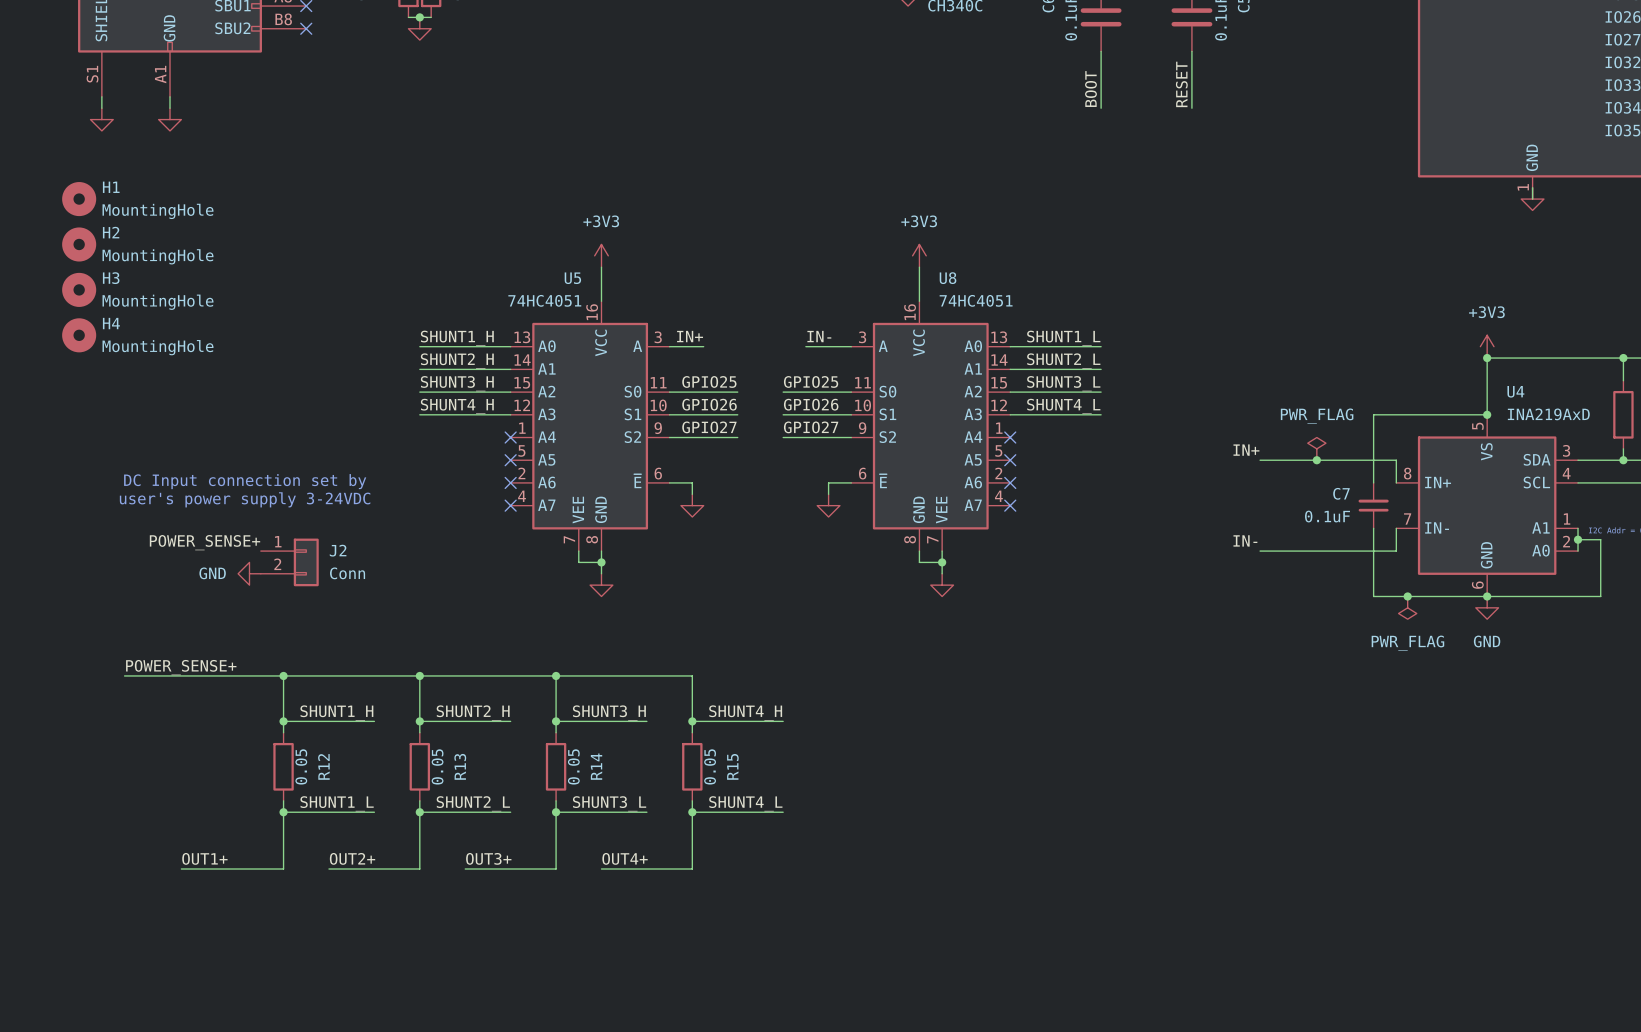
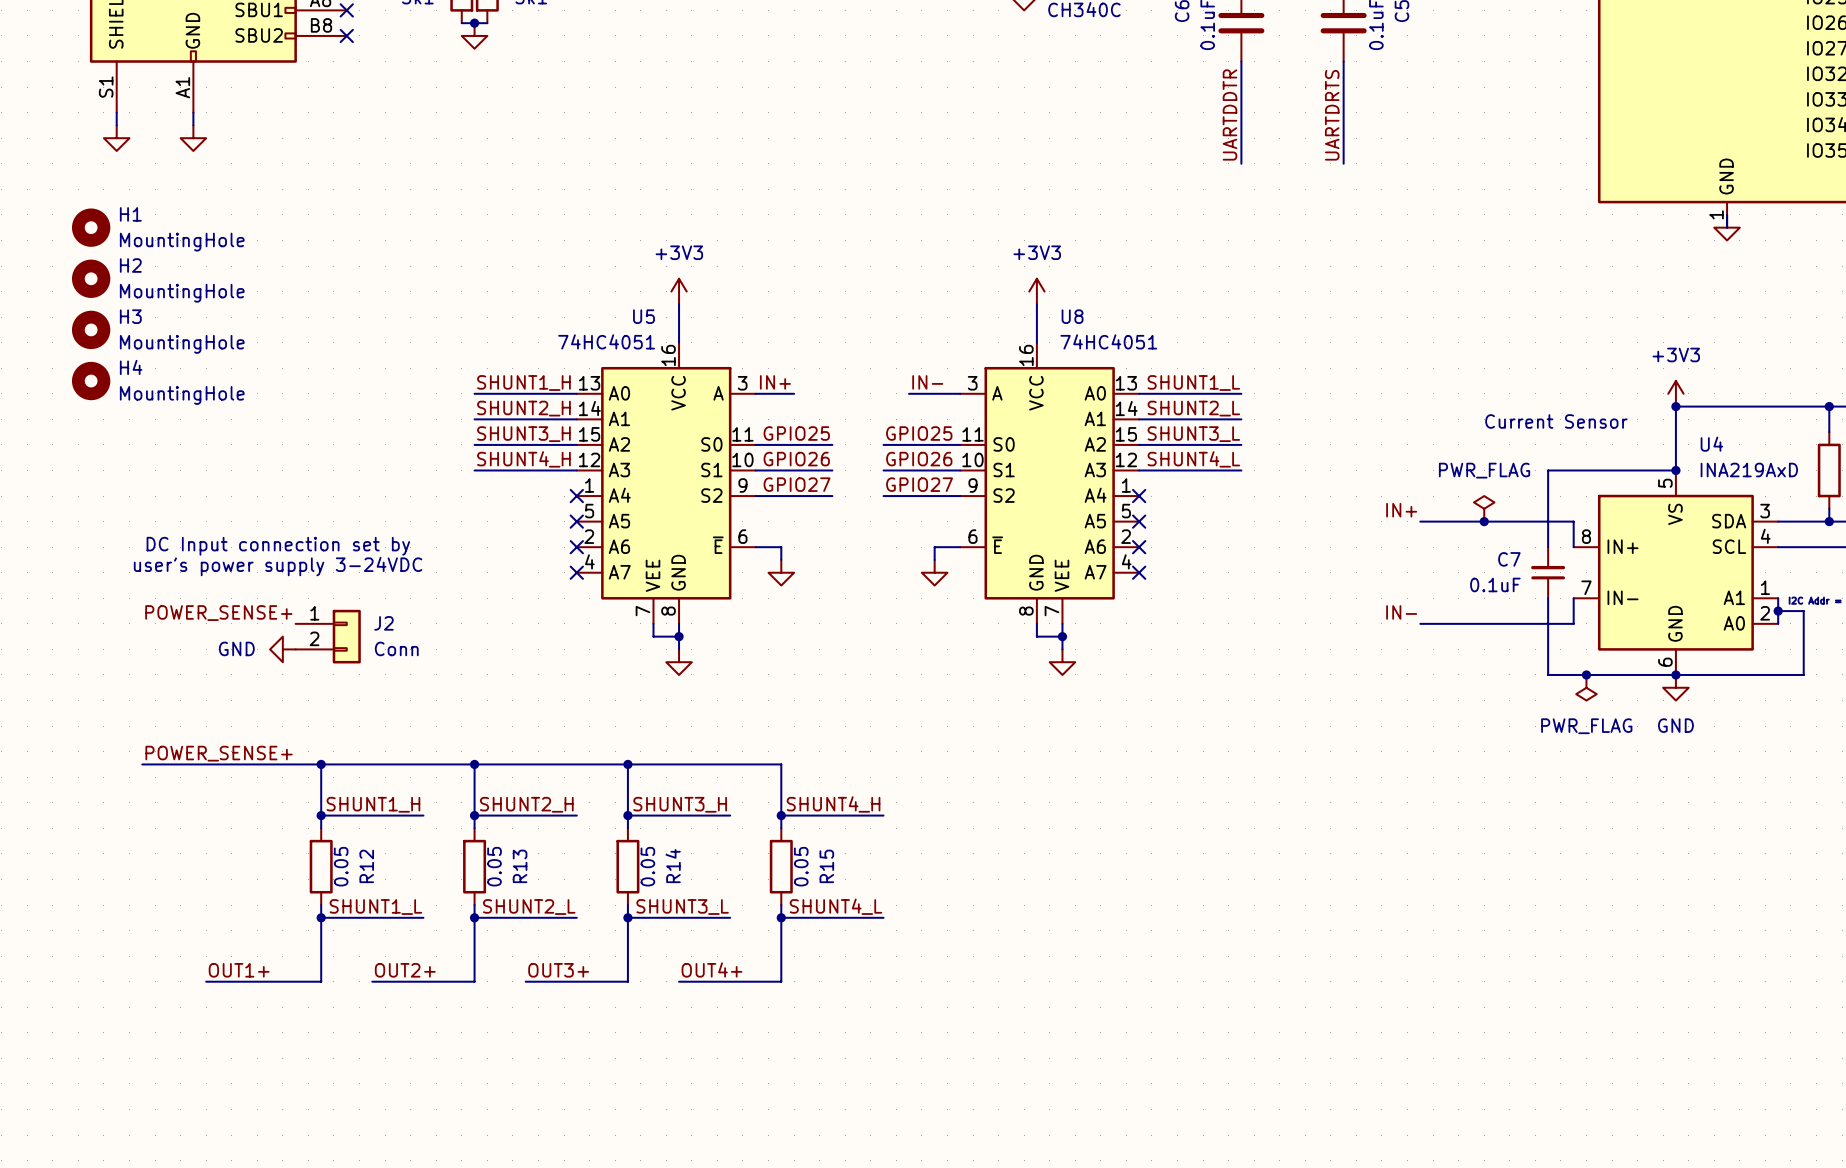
label: RESET (1181, 84) -> none
label: BOOT (1090, 89) -> none
label: none -> UARTDDTR (1229, 114)
label: none -> UARTDRTS (1332, 115)
wire: none -> (1241, 125) (1241, 163)
wire: none -> (1343, 125) (1343, 163)
text: none -> Current Sensor (1556, 421)

